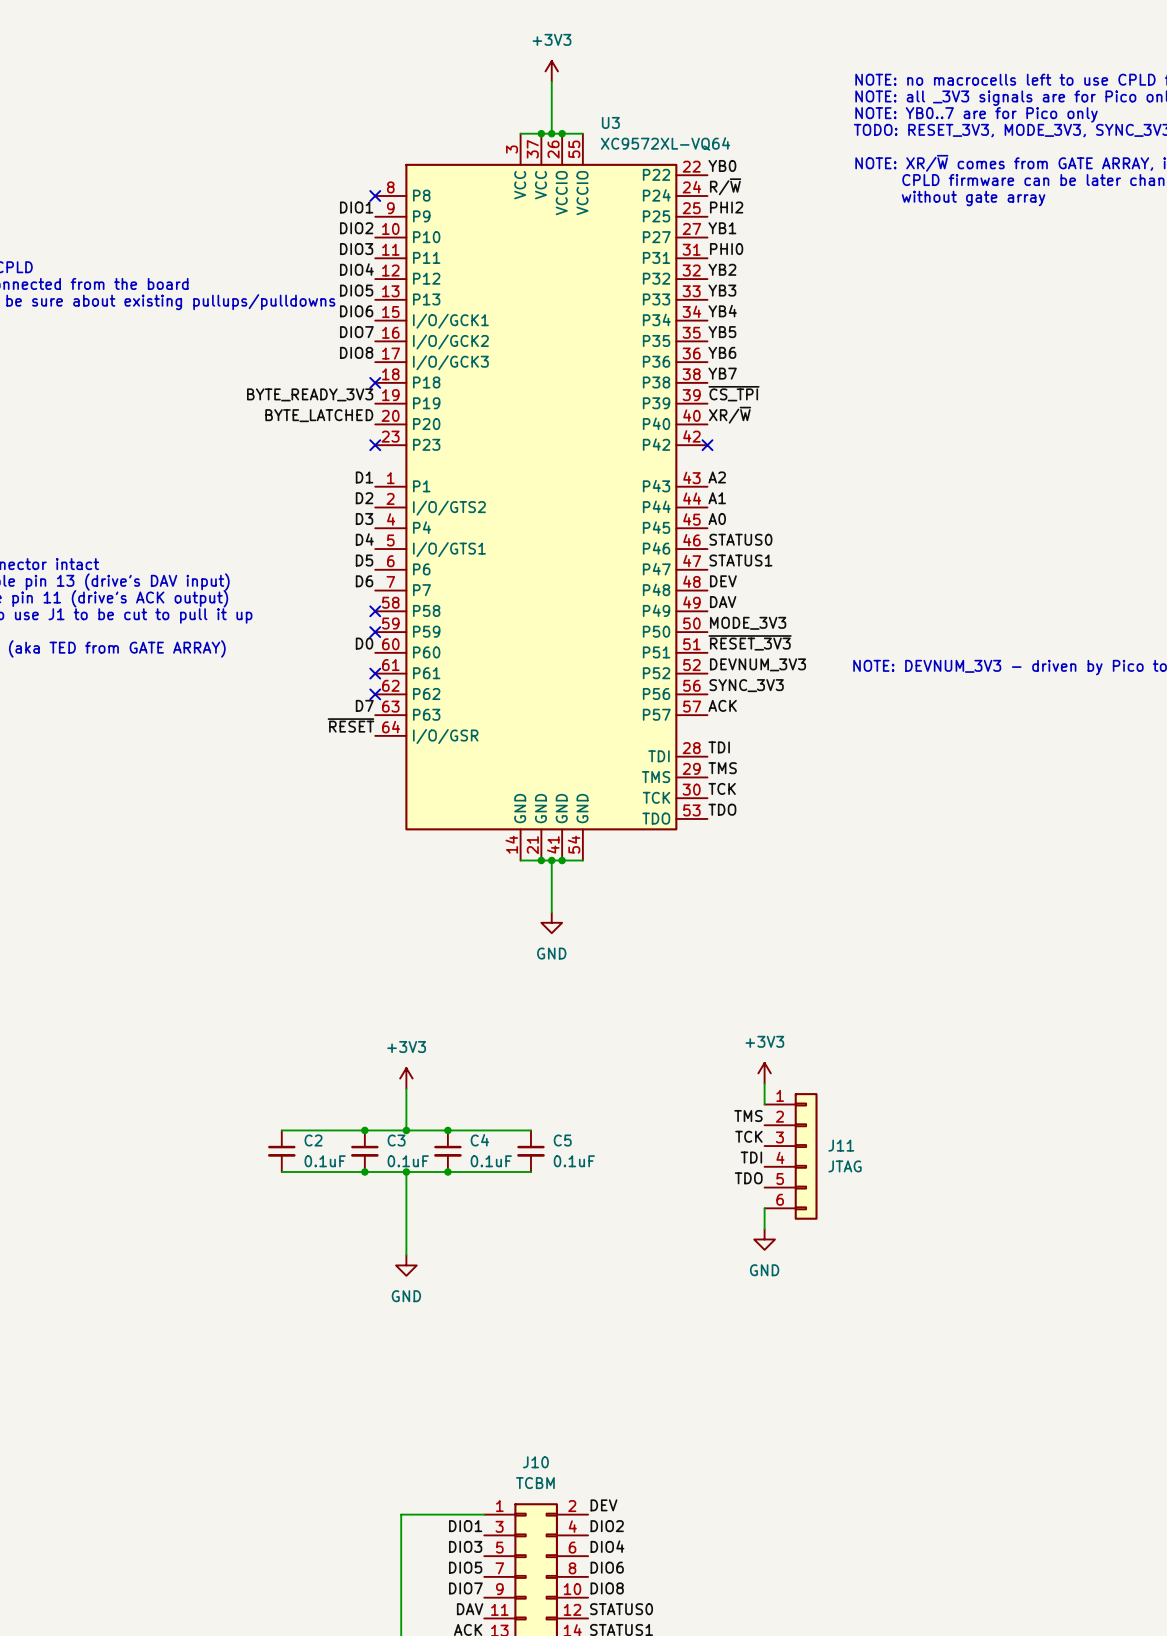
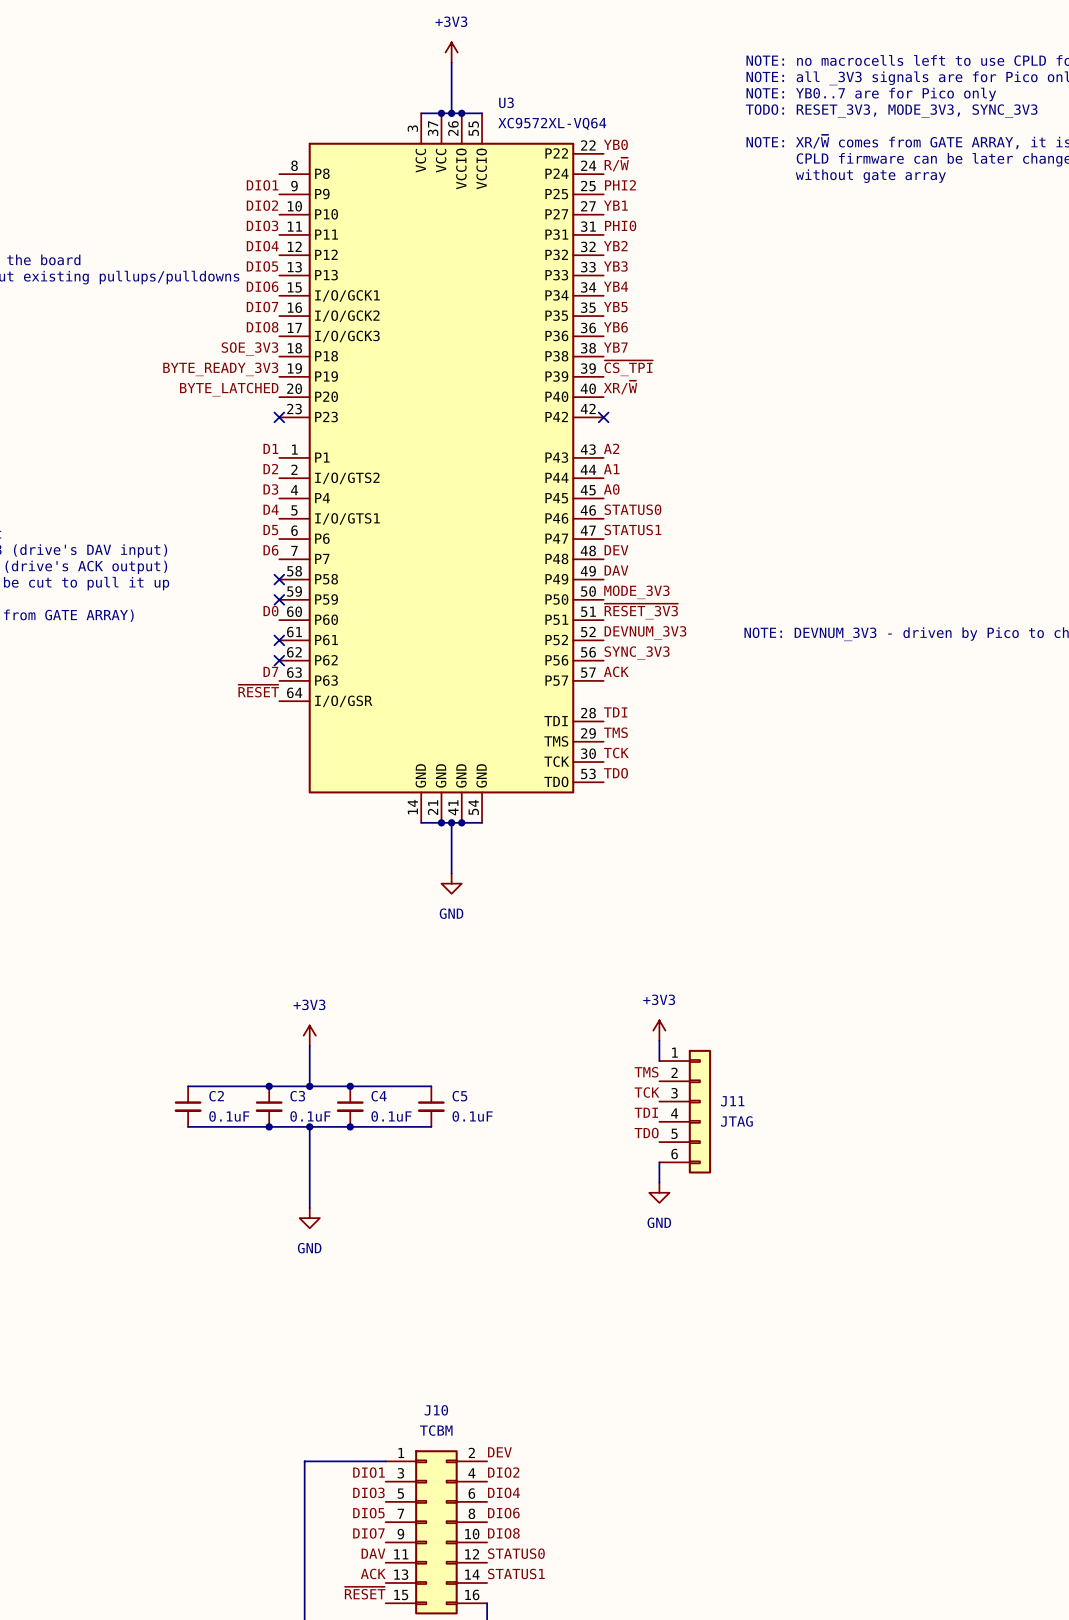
no-connect mark: (375, 196) -> none
label: none -> SOE_3V3 (249, 349)
no-connect mark: (375, 382) -> none

